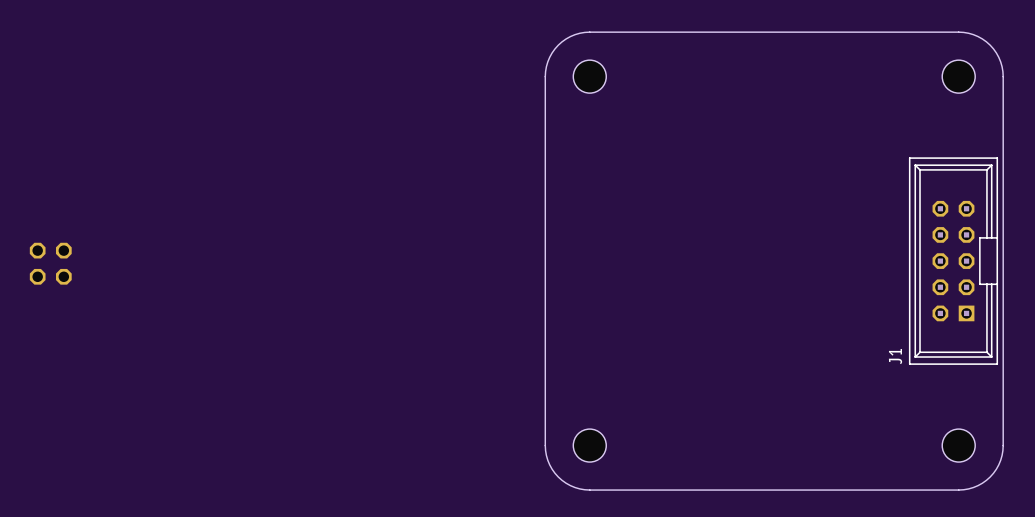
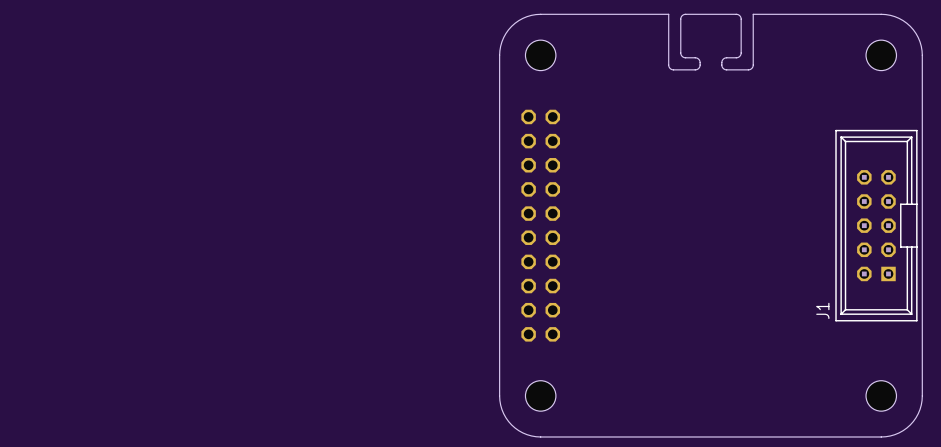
board edge: (746, 32) (728, 32) -> (685, 14) (680, 18) (680, 53) (684, 57) (698, 59) (699, 66) (695, 69) (672, 69) (669, 66) (668, 14)
board edge: (820, 32) (801, 32) -> (753, 14) (752, 66) (749, 69) (726, 69) (722, 66) (723, 59) (737, 57) (741, 53) (741, 18) (736, 14)
part: none -> (540, 225)
part: (50, 263) -> none

